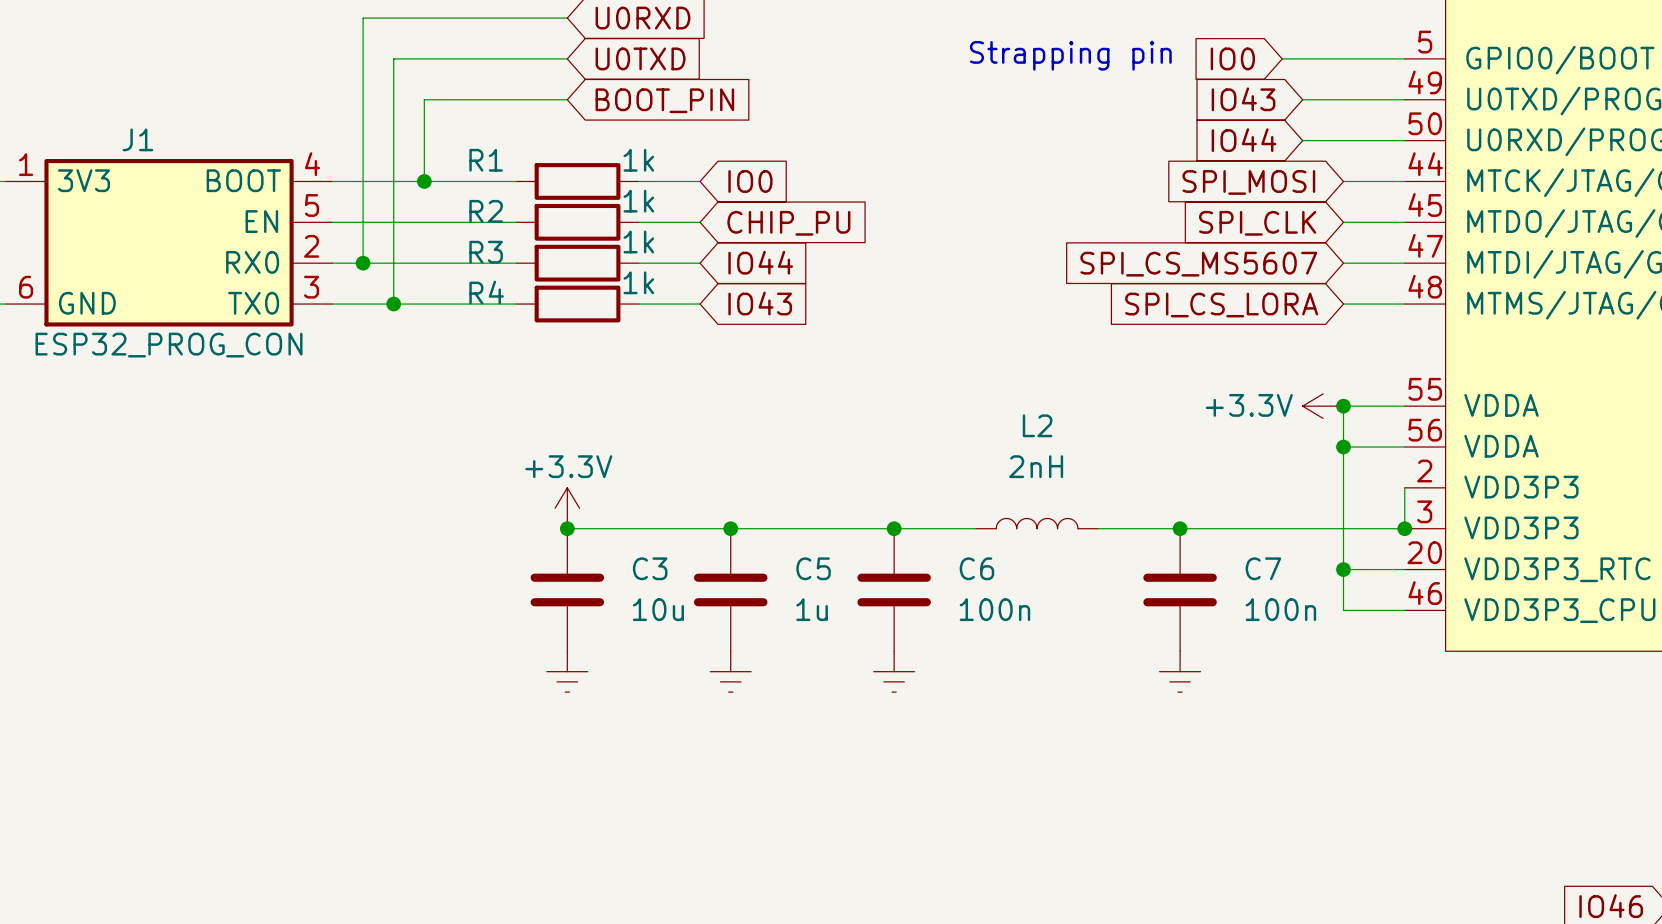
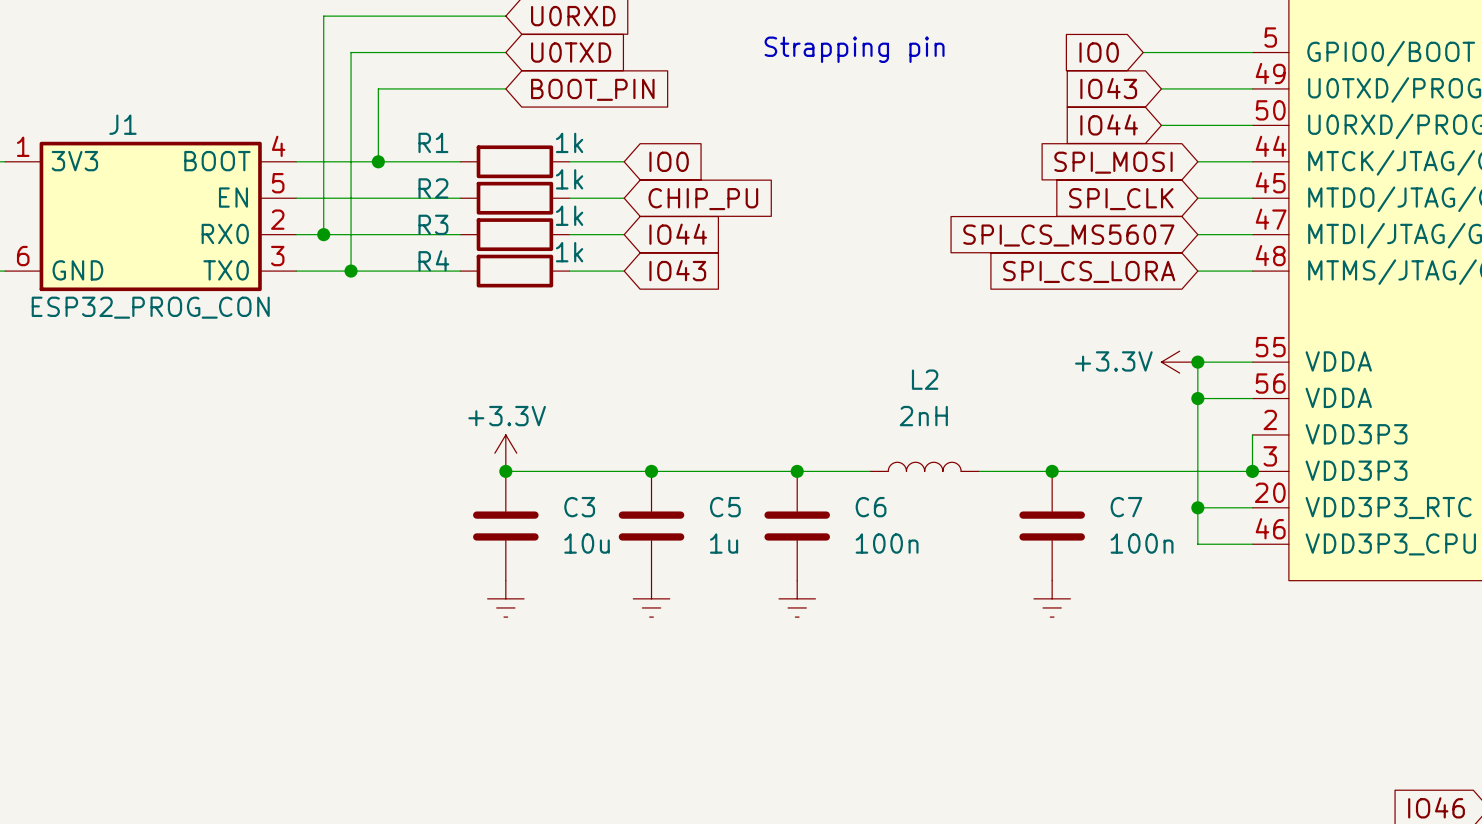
text position: Strapping pin (1070, 55) -> Strapping pin (854, 49)

